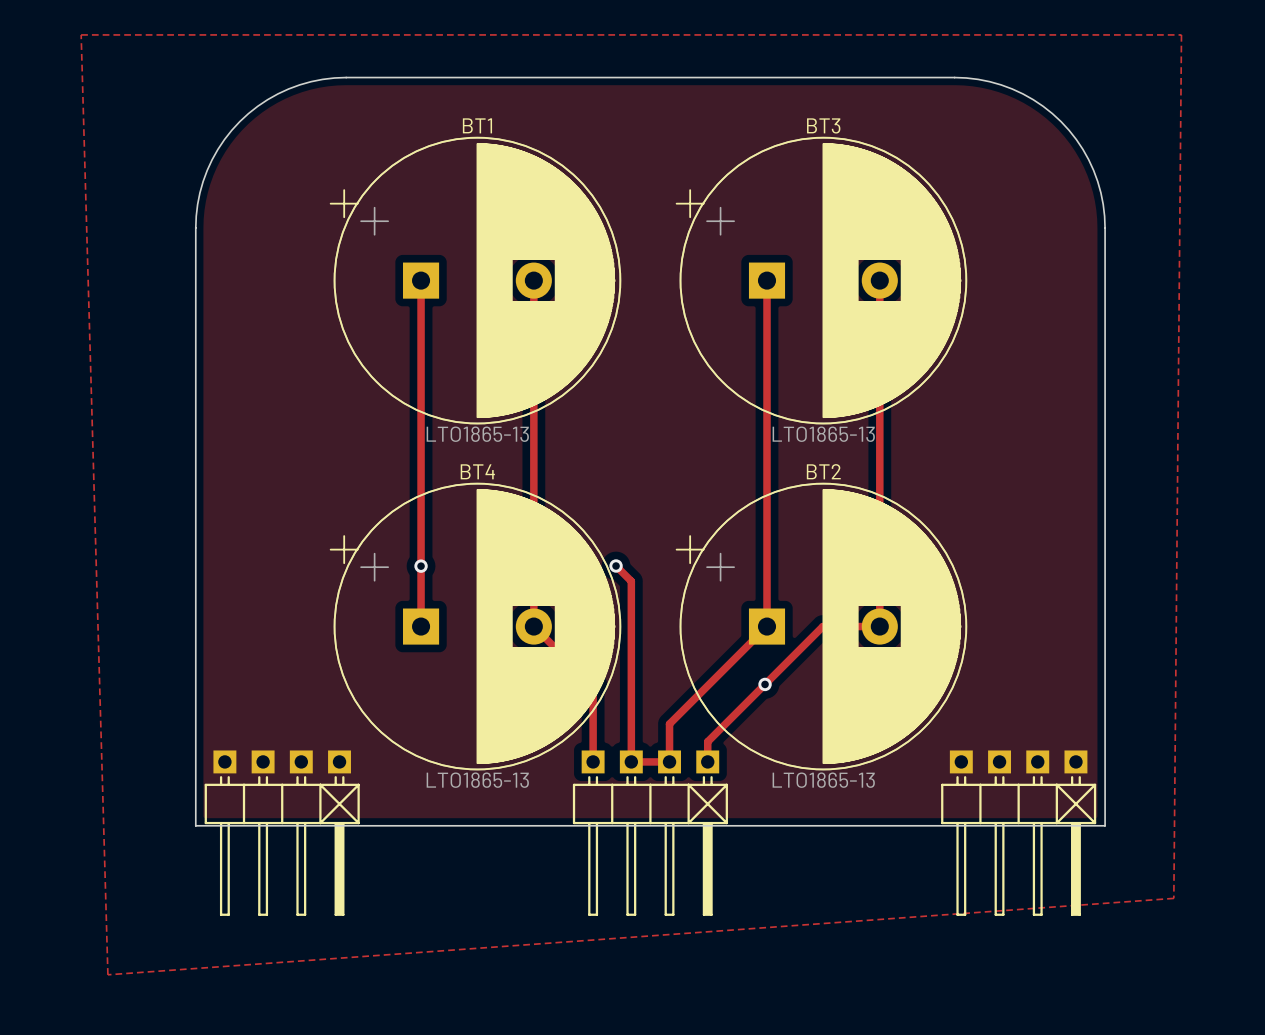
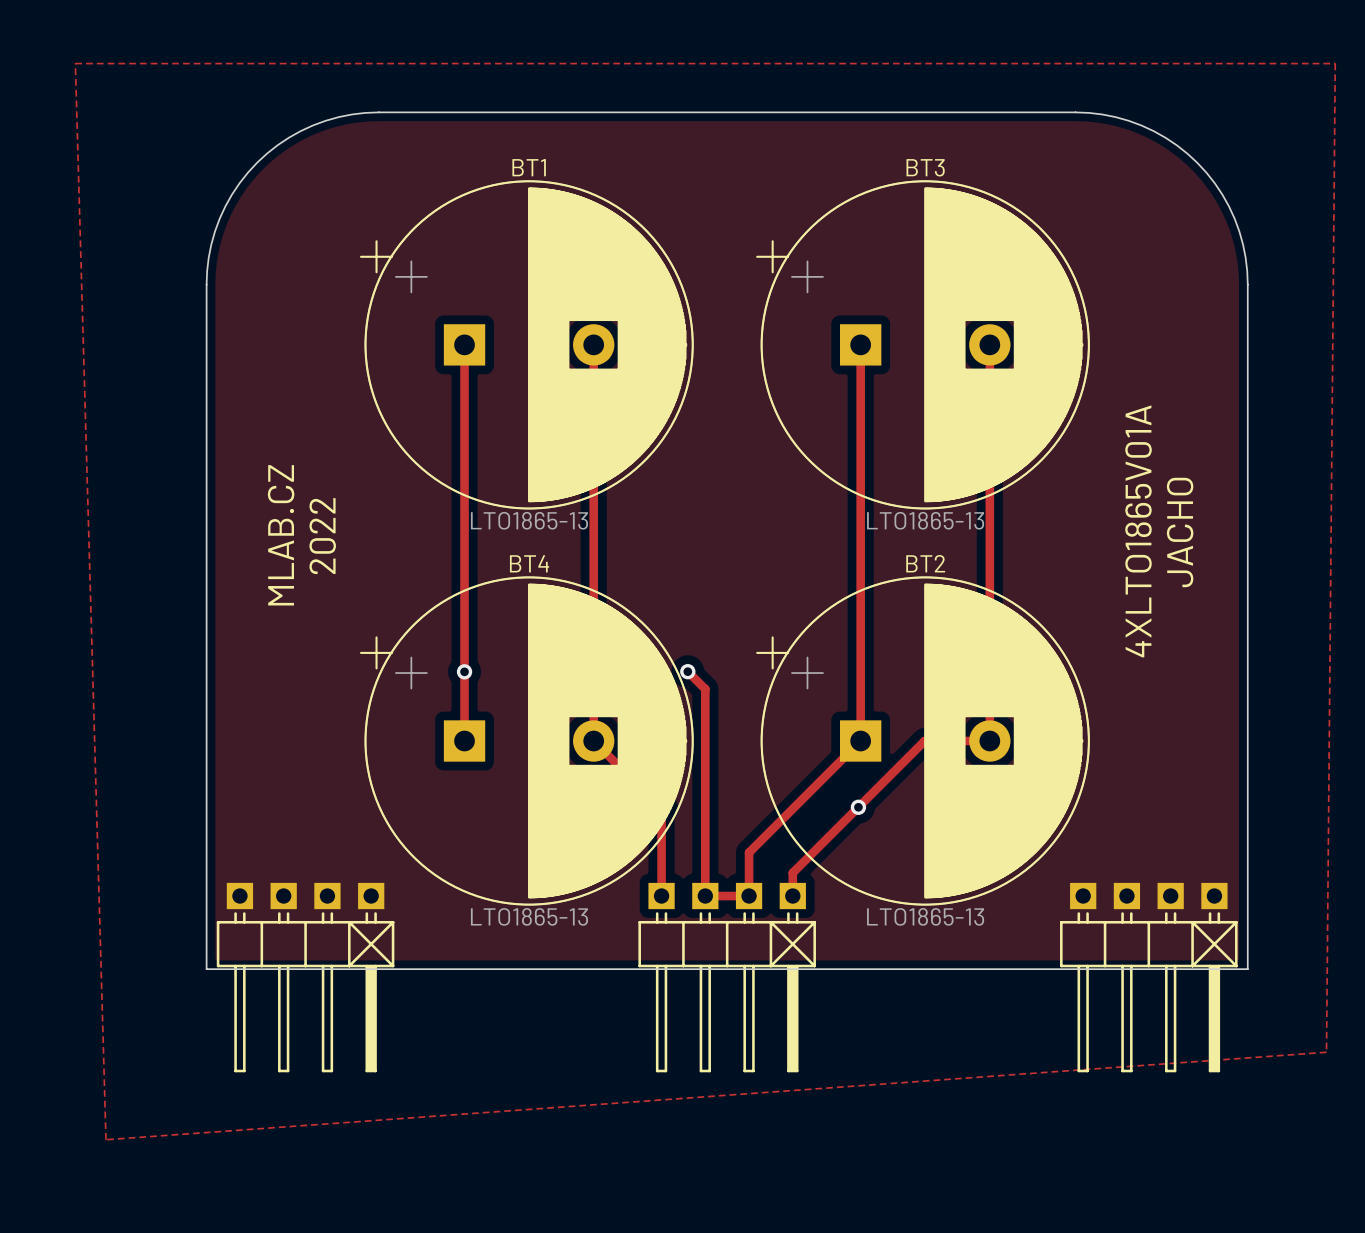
text: none -> 4XLTO1865V01A (1138, 531)
text: none -> JACHO (1180, 532)
text: none -> MLAB.CZ (281, 535)
text: none -> 2022 (322, 536)

